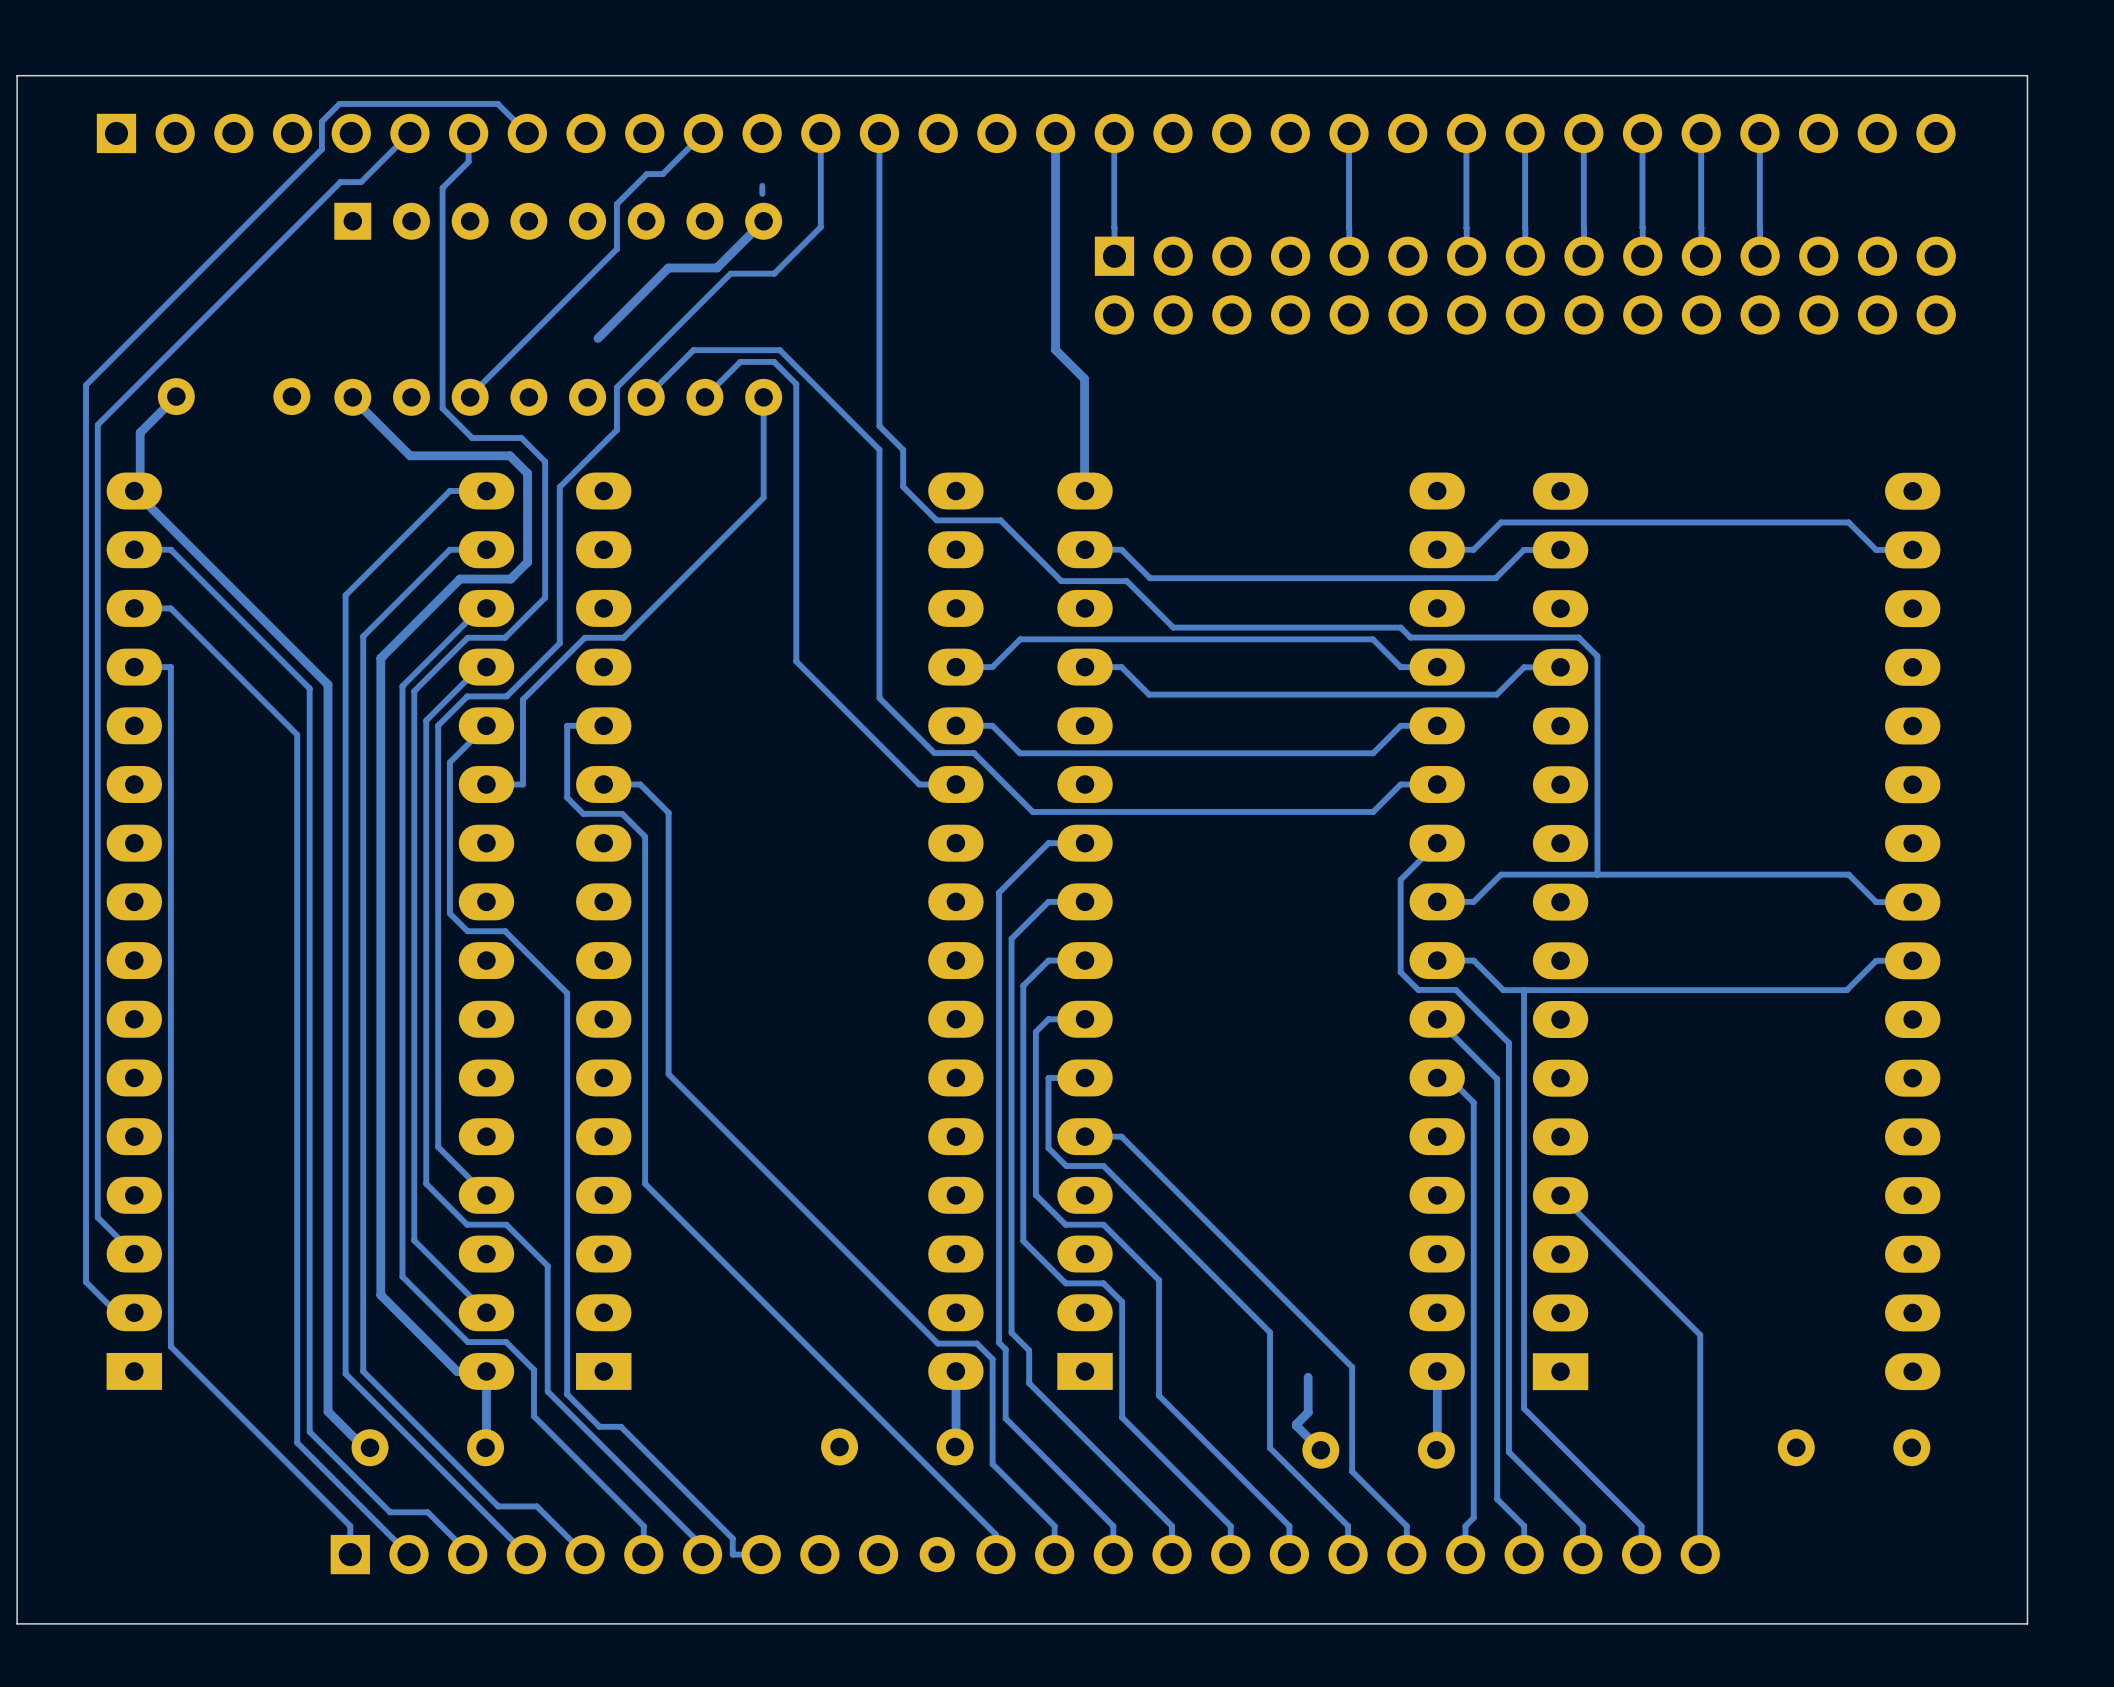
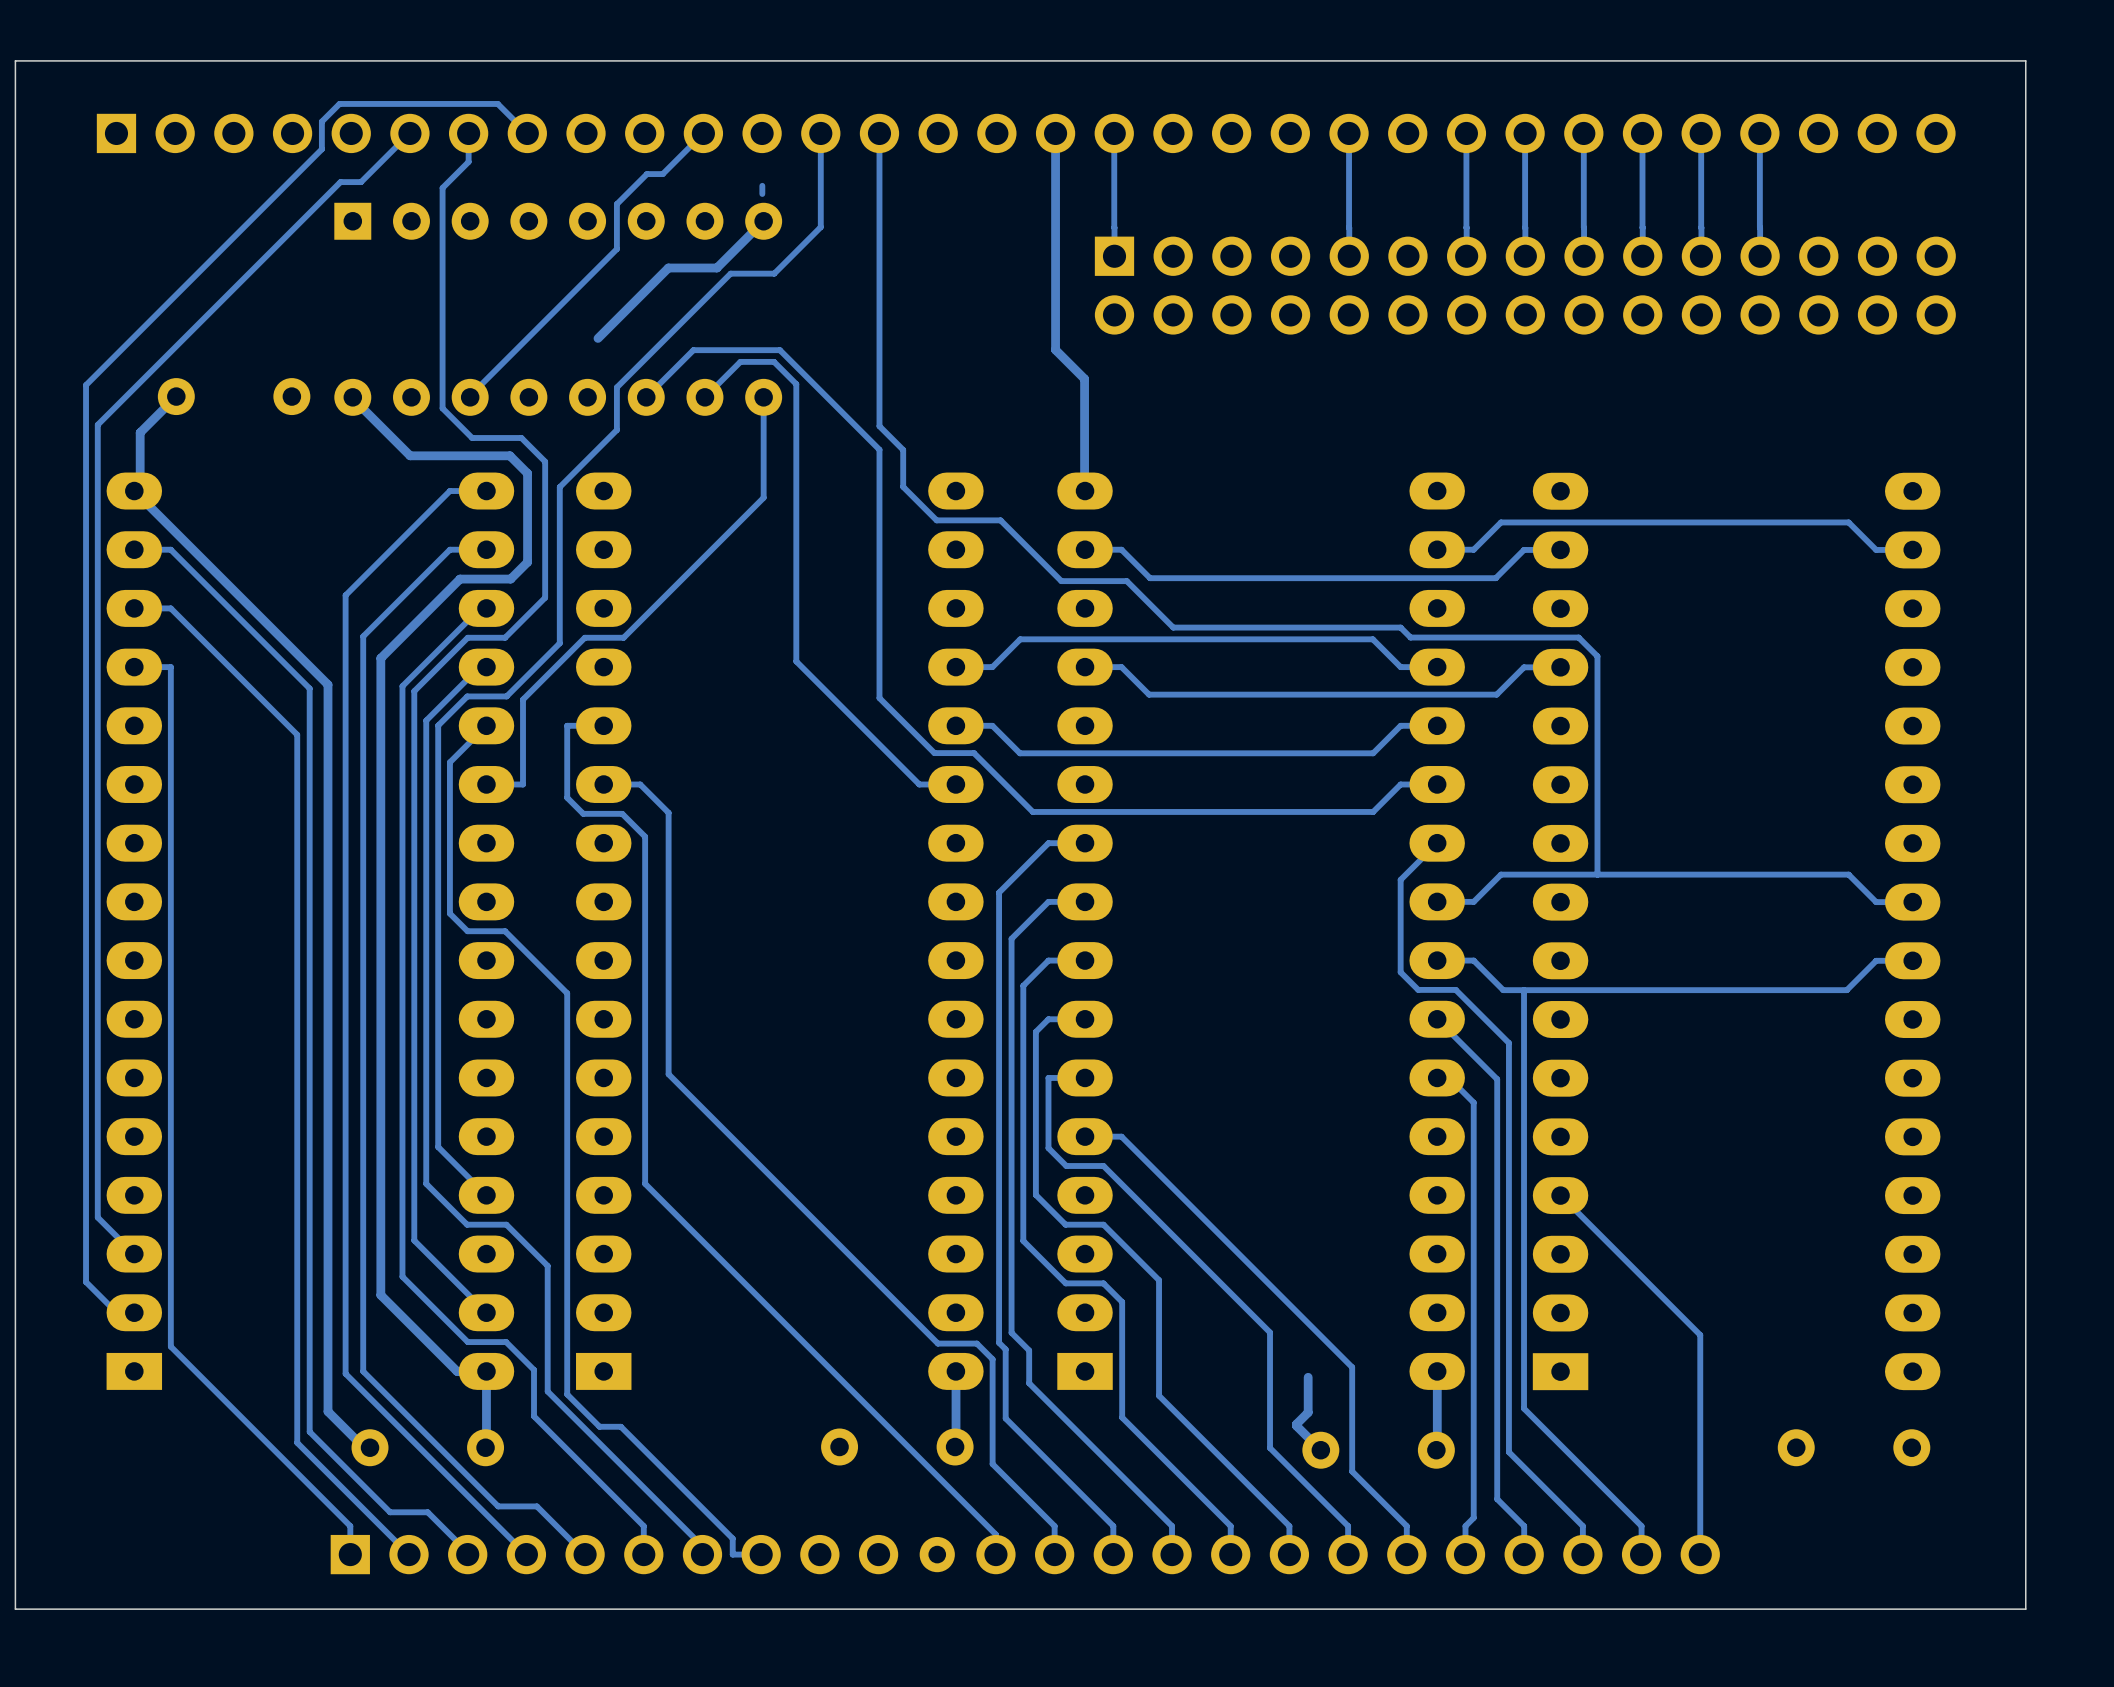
board edge: (2027, 75) (17, 75) (17, 1623) (2027, 1623) (2027, 75) -> (2025, 60) (15, 60) (15, 1609) (2025, 1609) (2025, 60)

